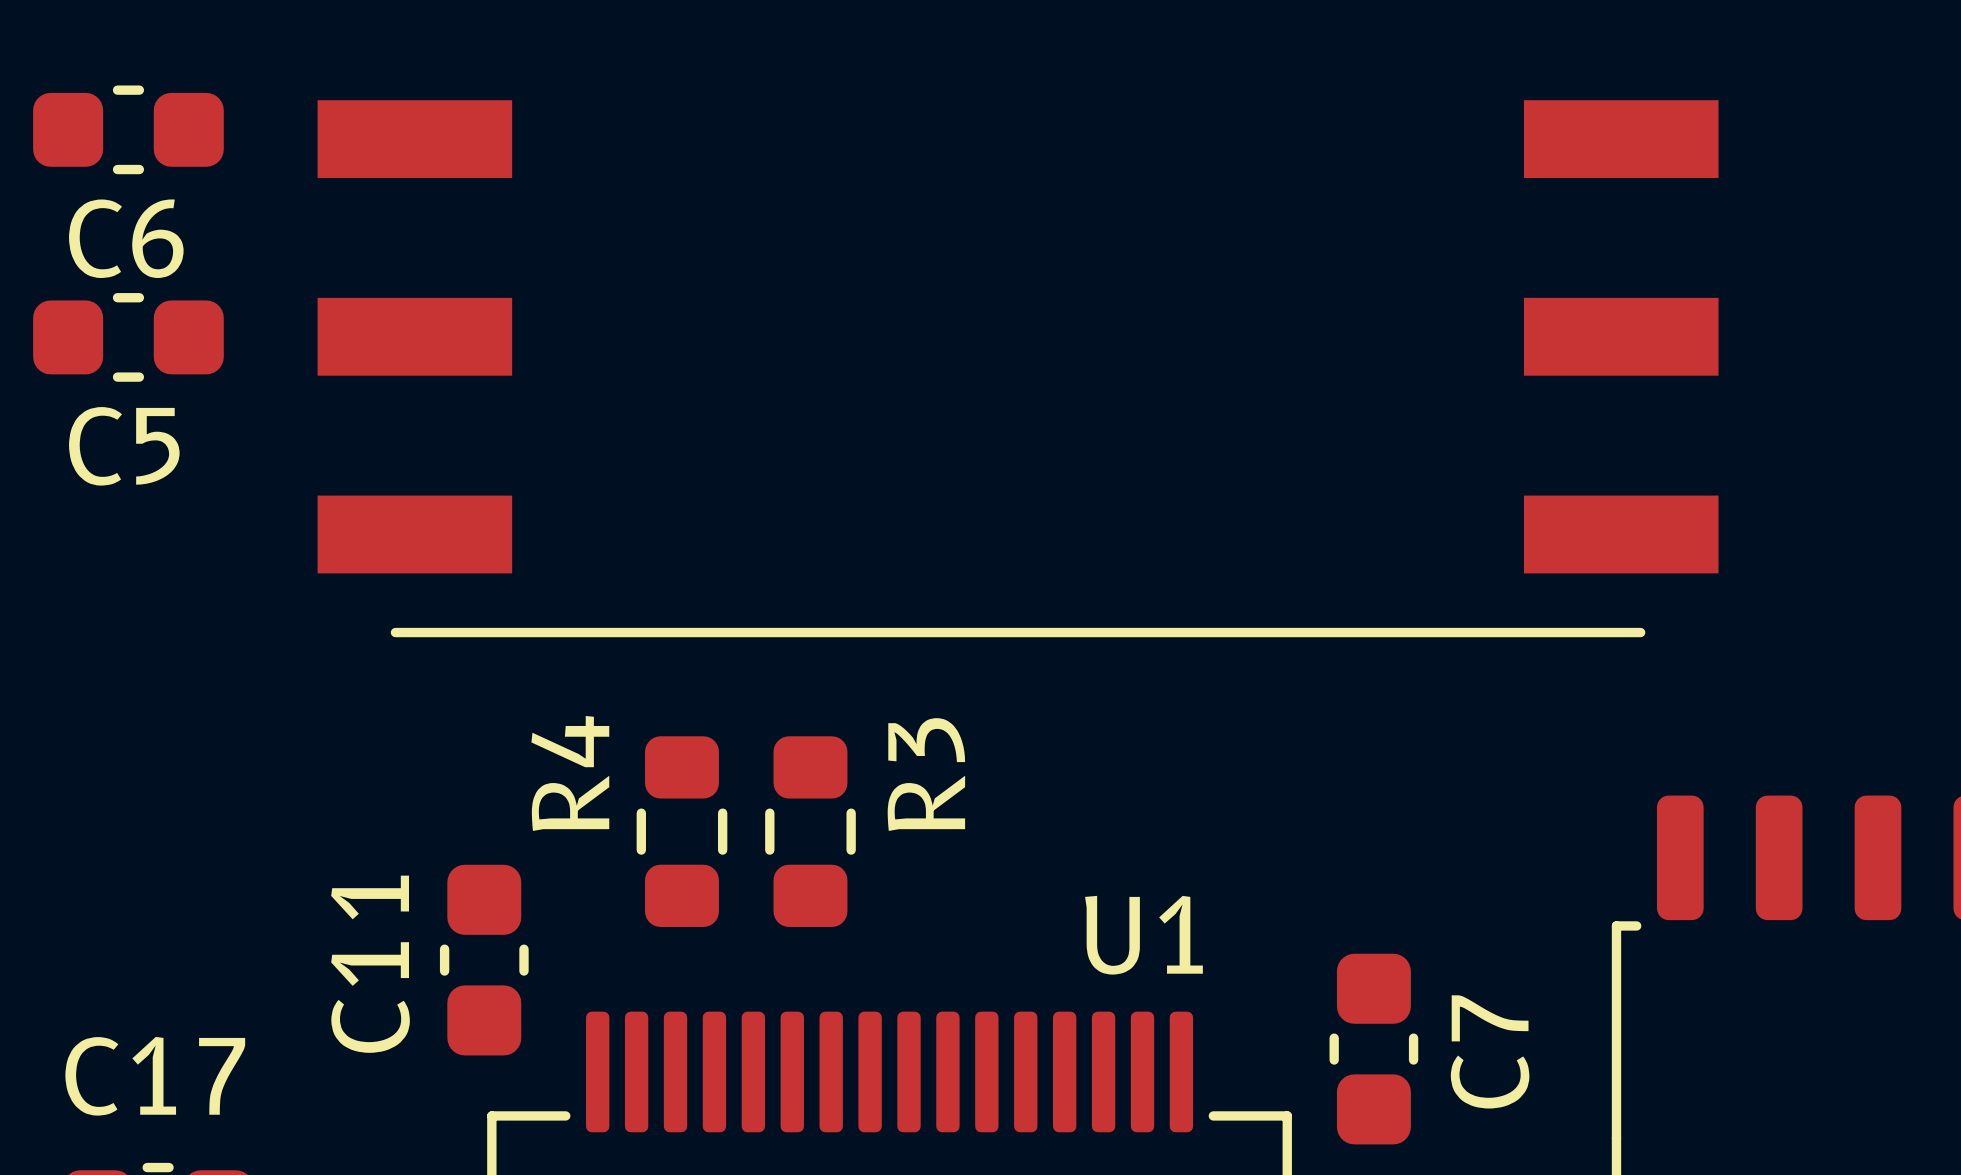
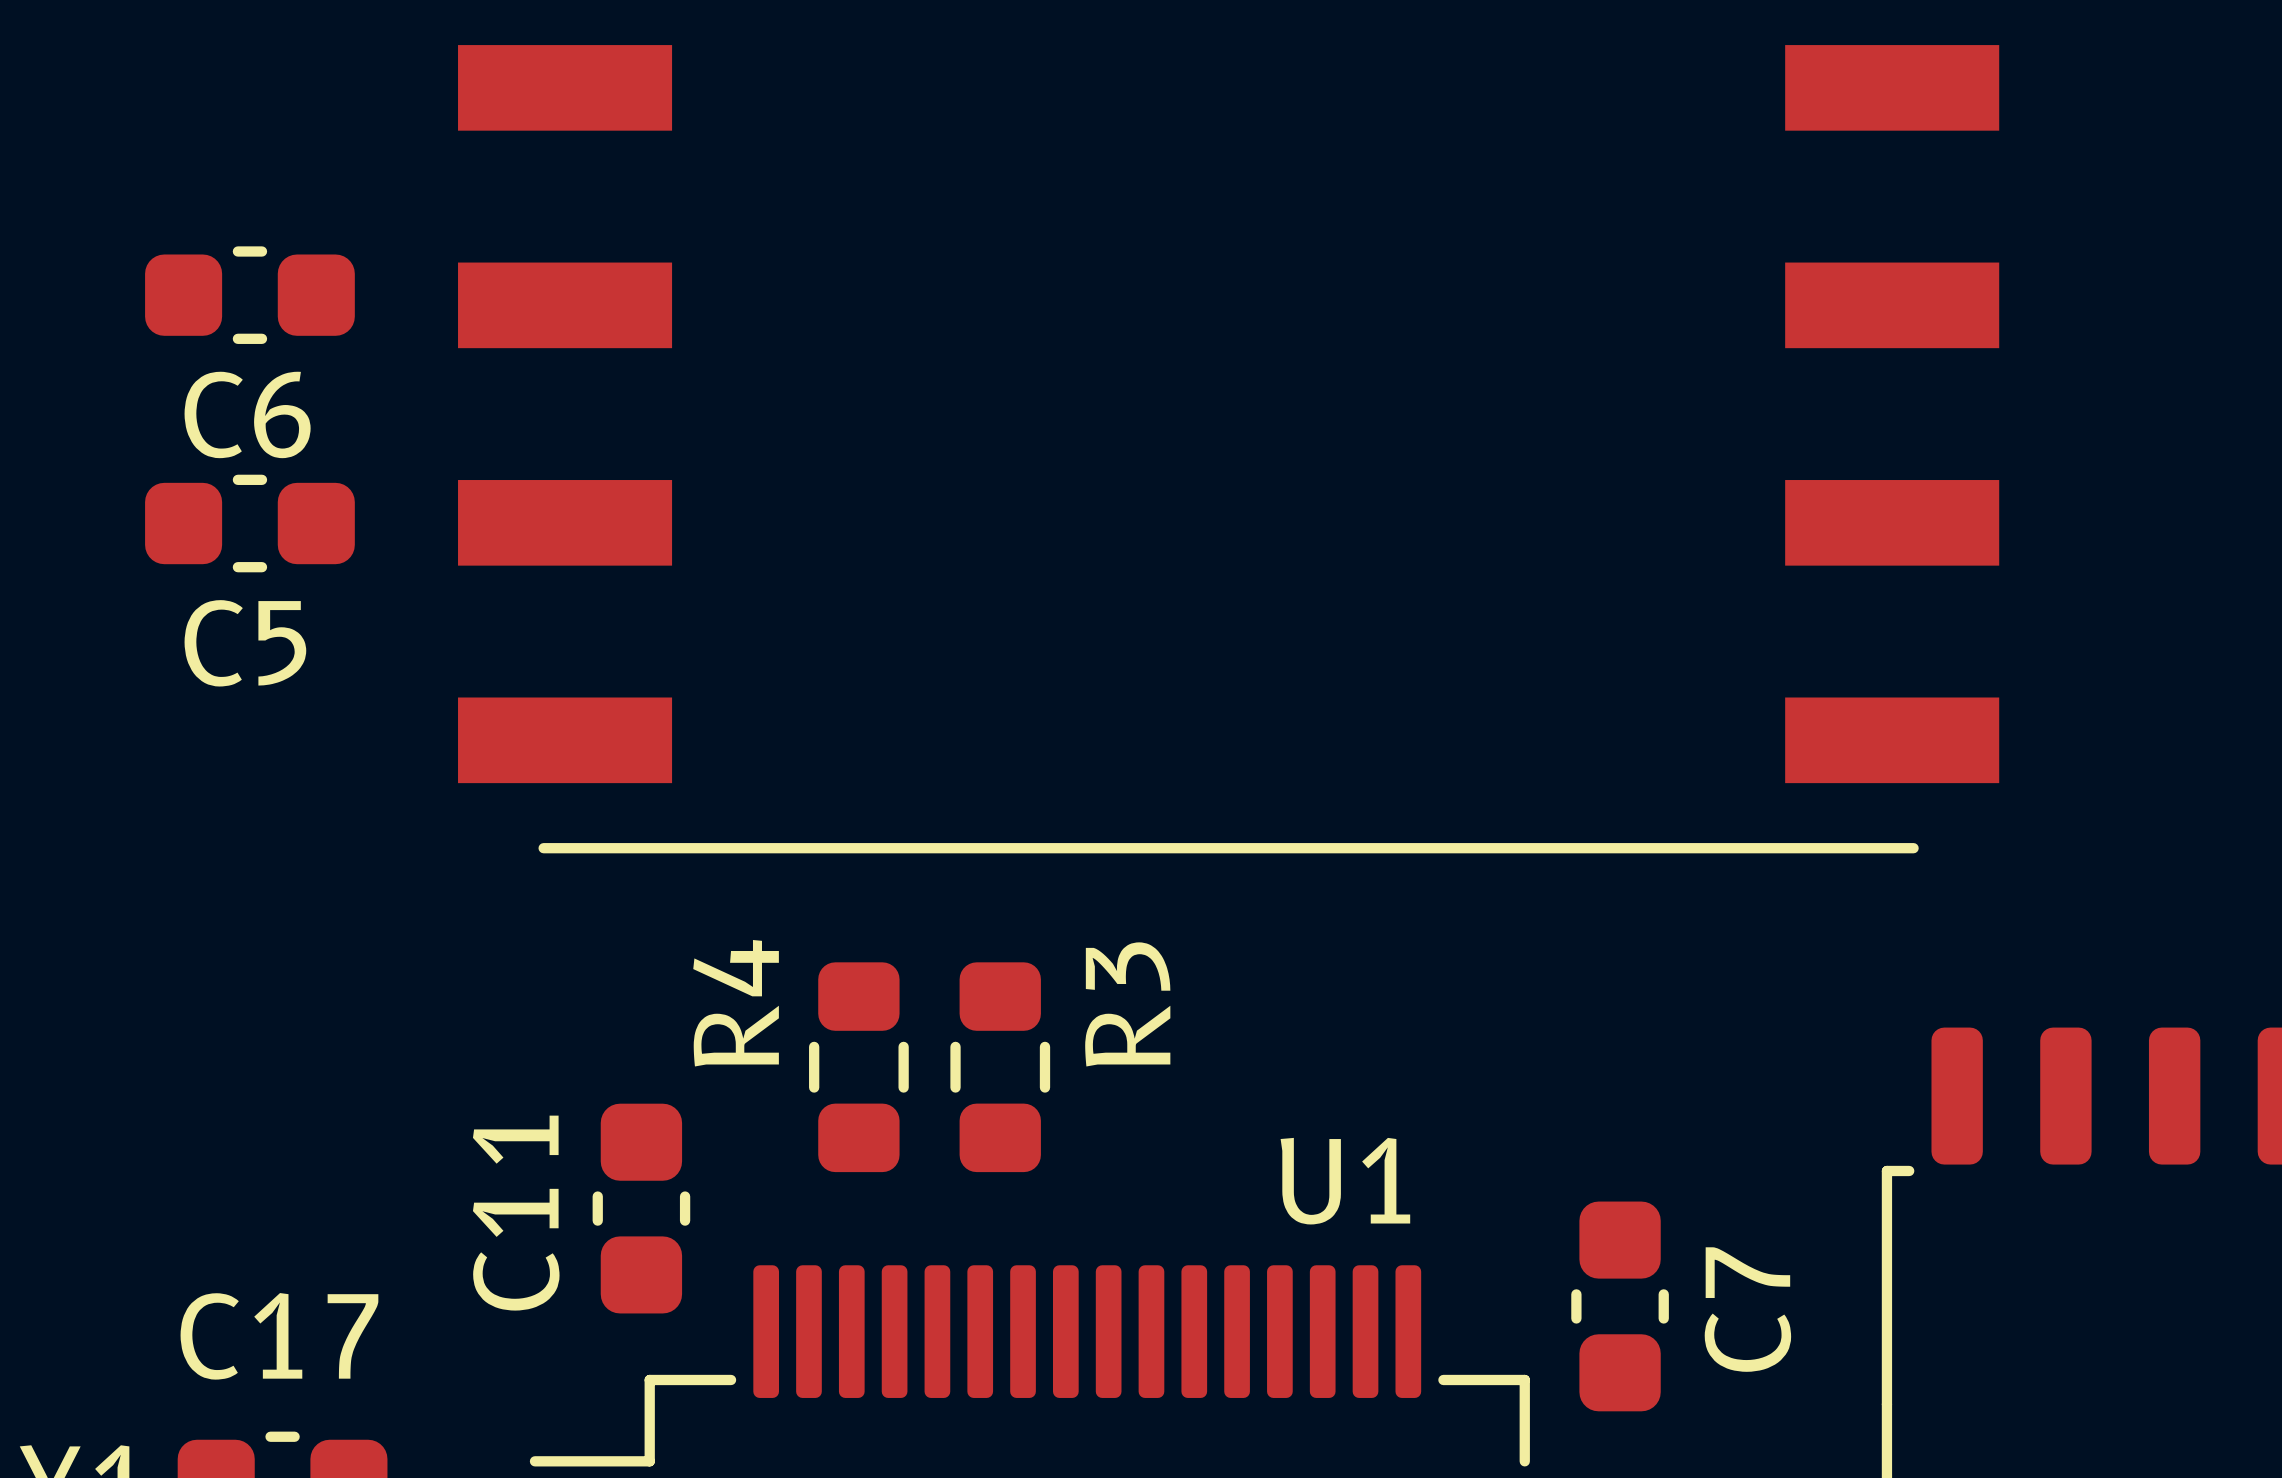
U1 name position: U1 (1143, 935) -> U1 (1345, 1181)

